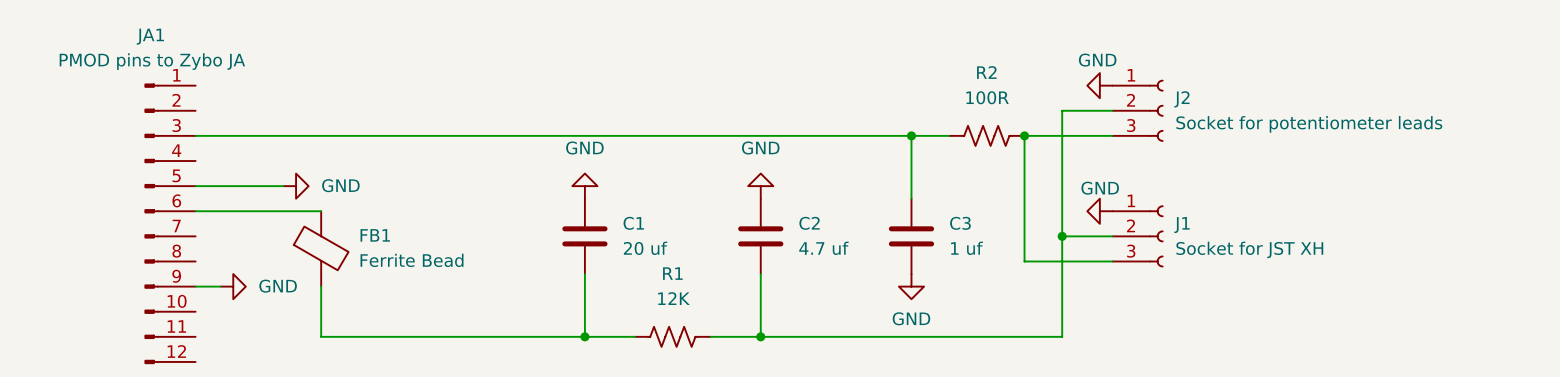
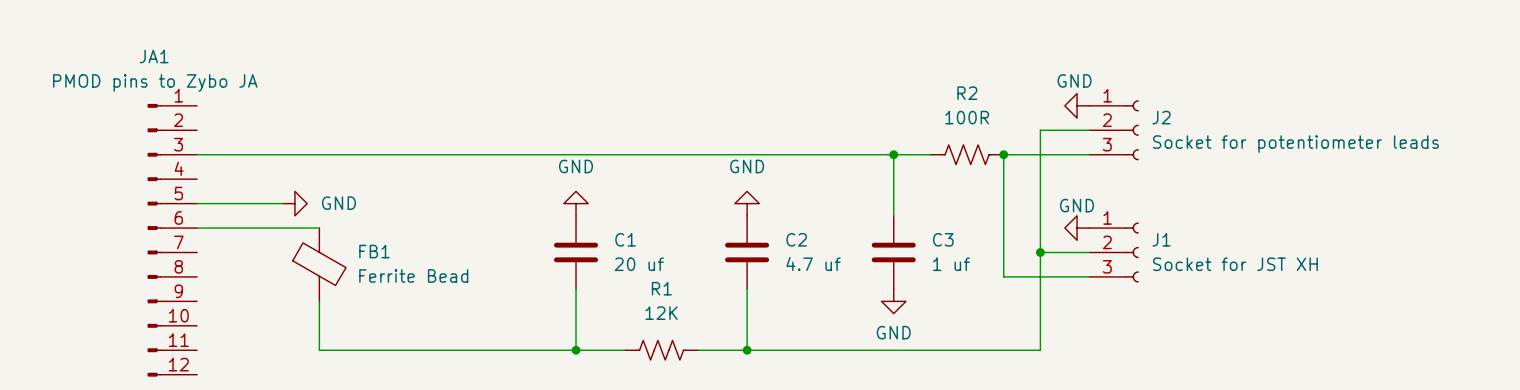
wire: (195, 286) (220, 286) -> none
power symbol: GND (233, 286) -> none

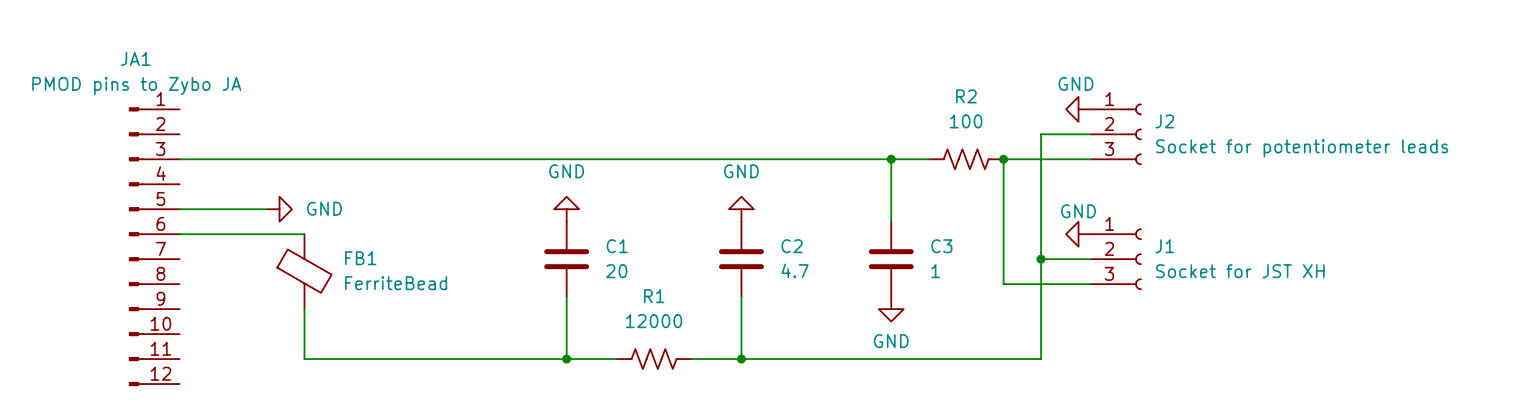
R2 value: 100R (967, 117) -> 100 (966, 121)
C2 value: 4.7 uf (813, 263) -> 4.7 (795, 270)
C1 value: 20 uf (639, 264) -> 20 (616, 271)
C3 value: 1 uf (951, 264) -> 1 (935, 271)
FB1 value: Ferrite Bead (413, 275) -> FerriteBead (396, 283)
R1 value: 12K (661, 313) -> 12000 (654, 321)

